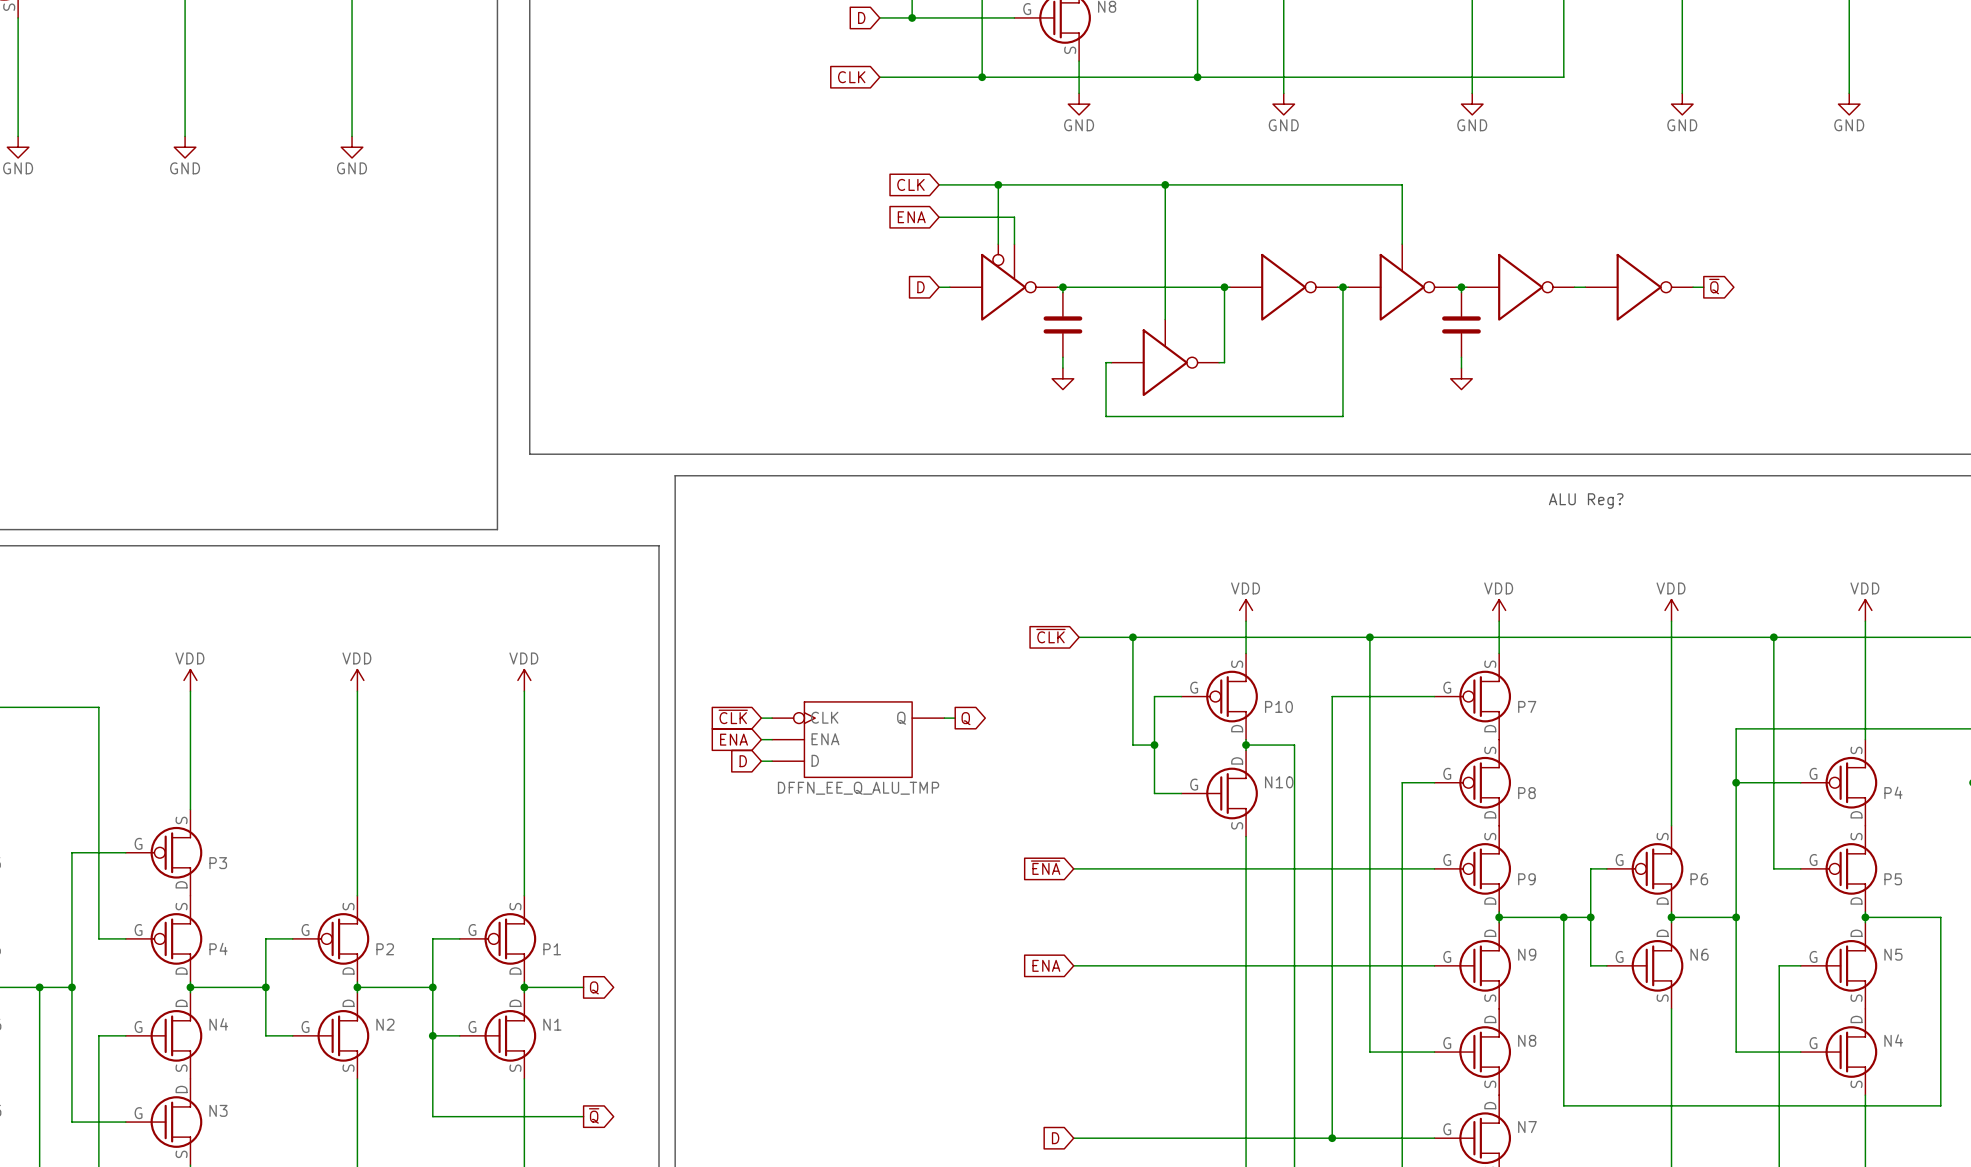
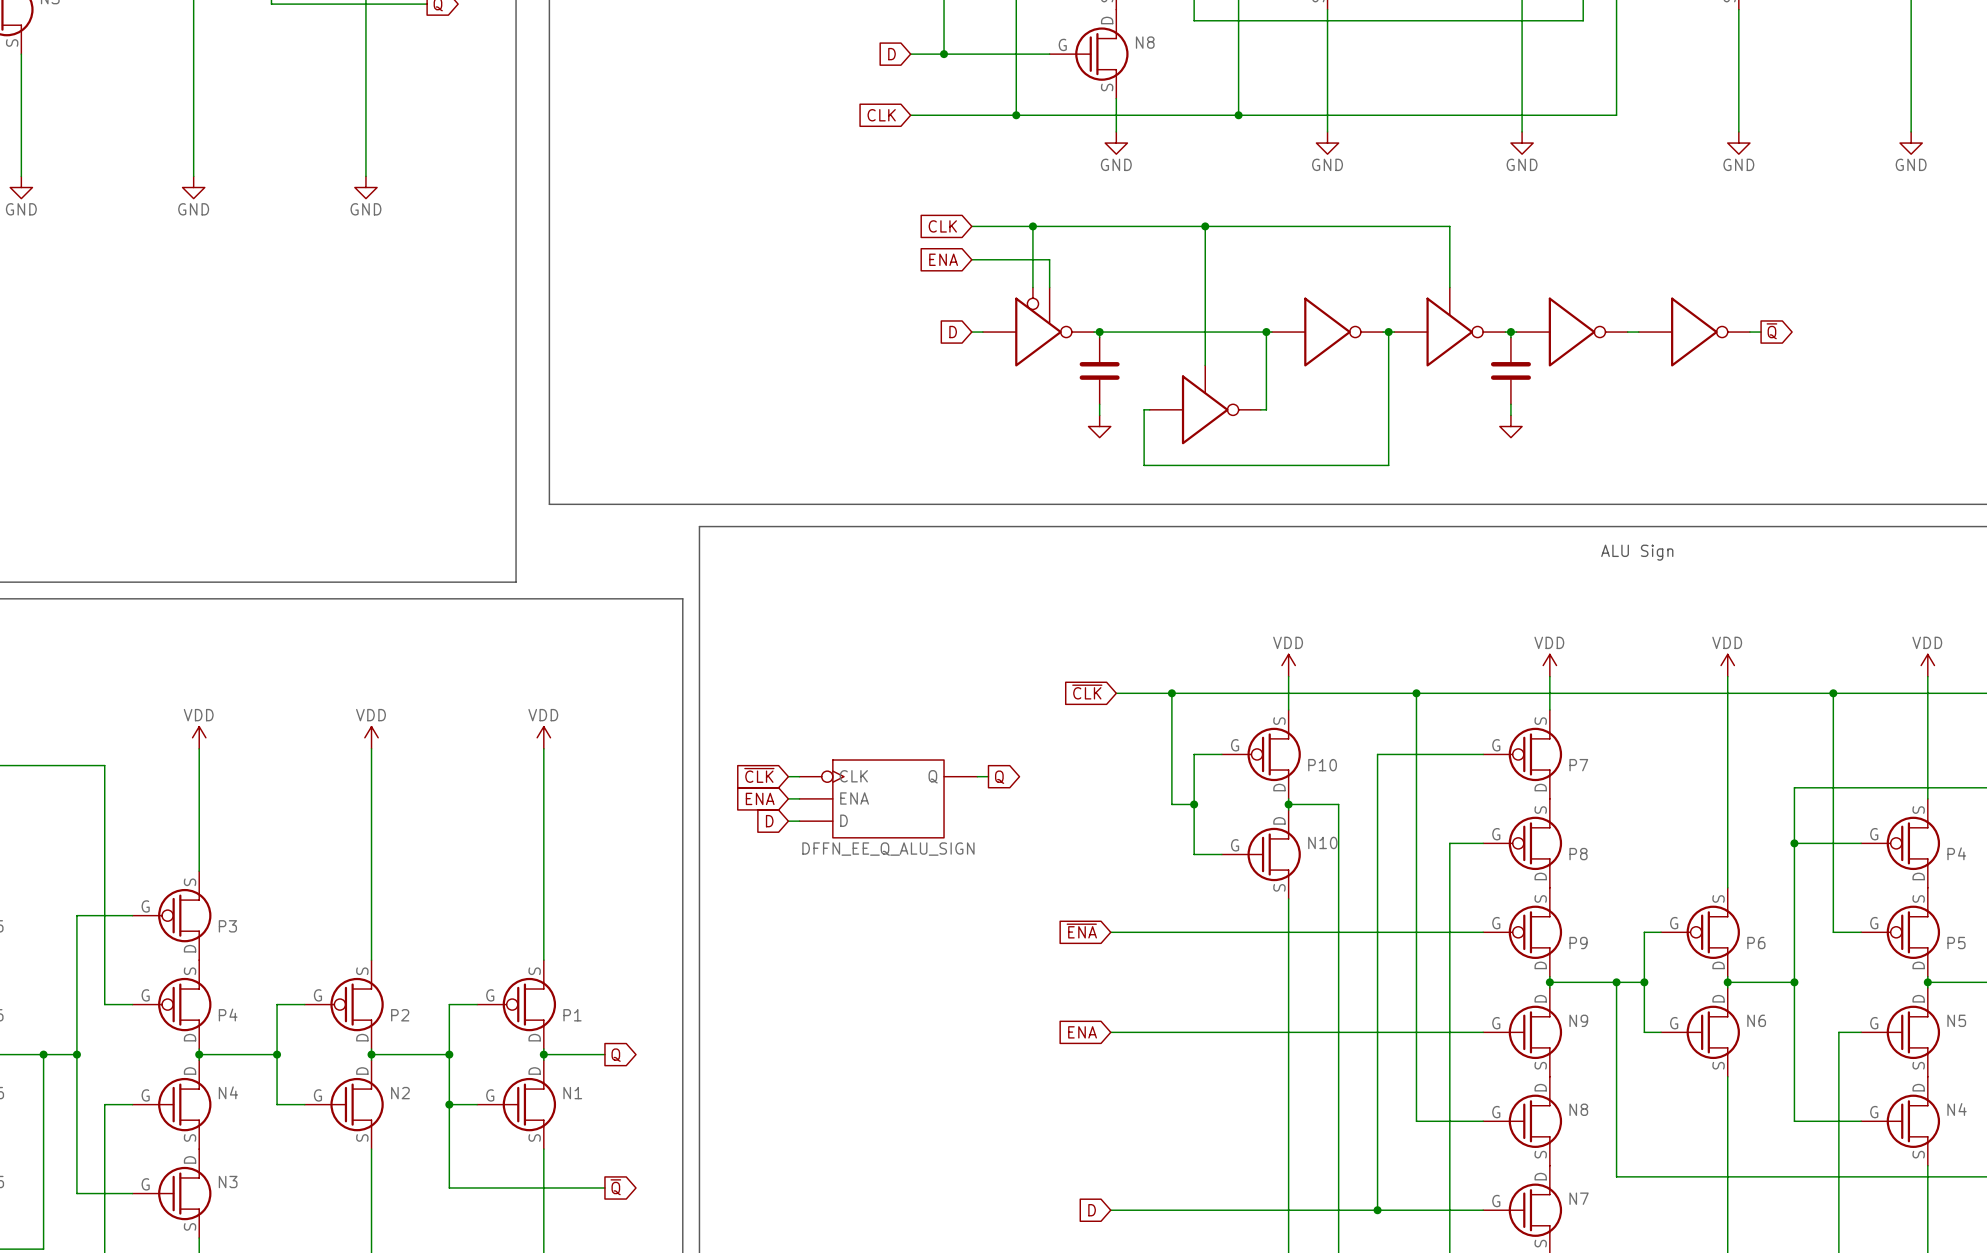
text: ALU Reg? (1586, 501) -> ALU Sign (1637, 552)
part value: DFFN_EE_Q_ALU_TMP (858, 788) -> DFFN_EE_Q_ALU_SIGN (888, 849)

